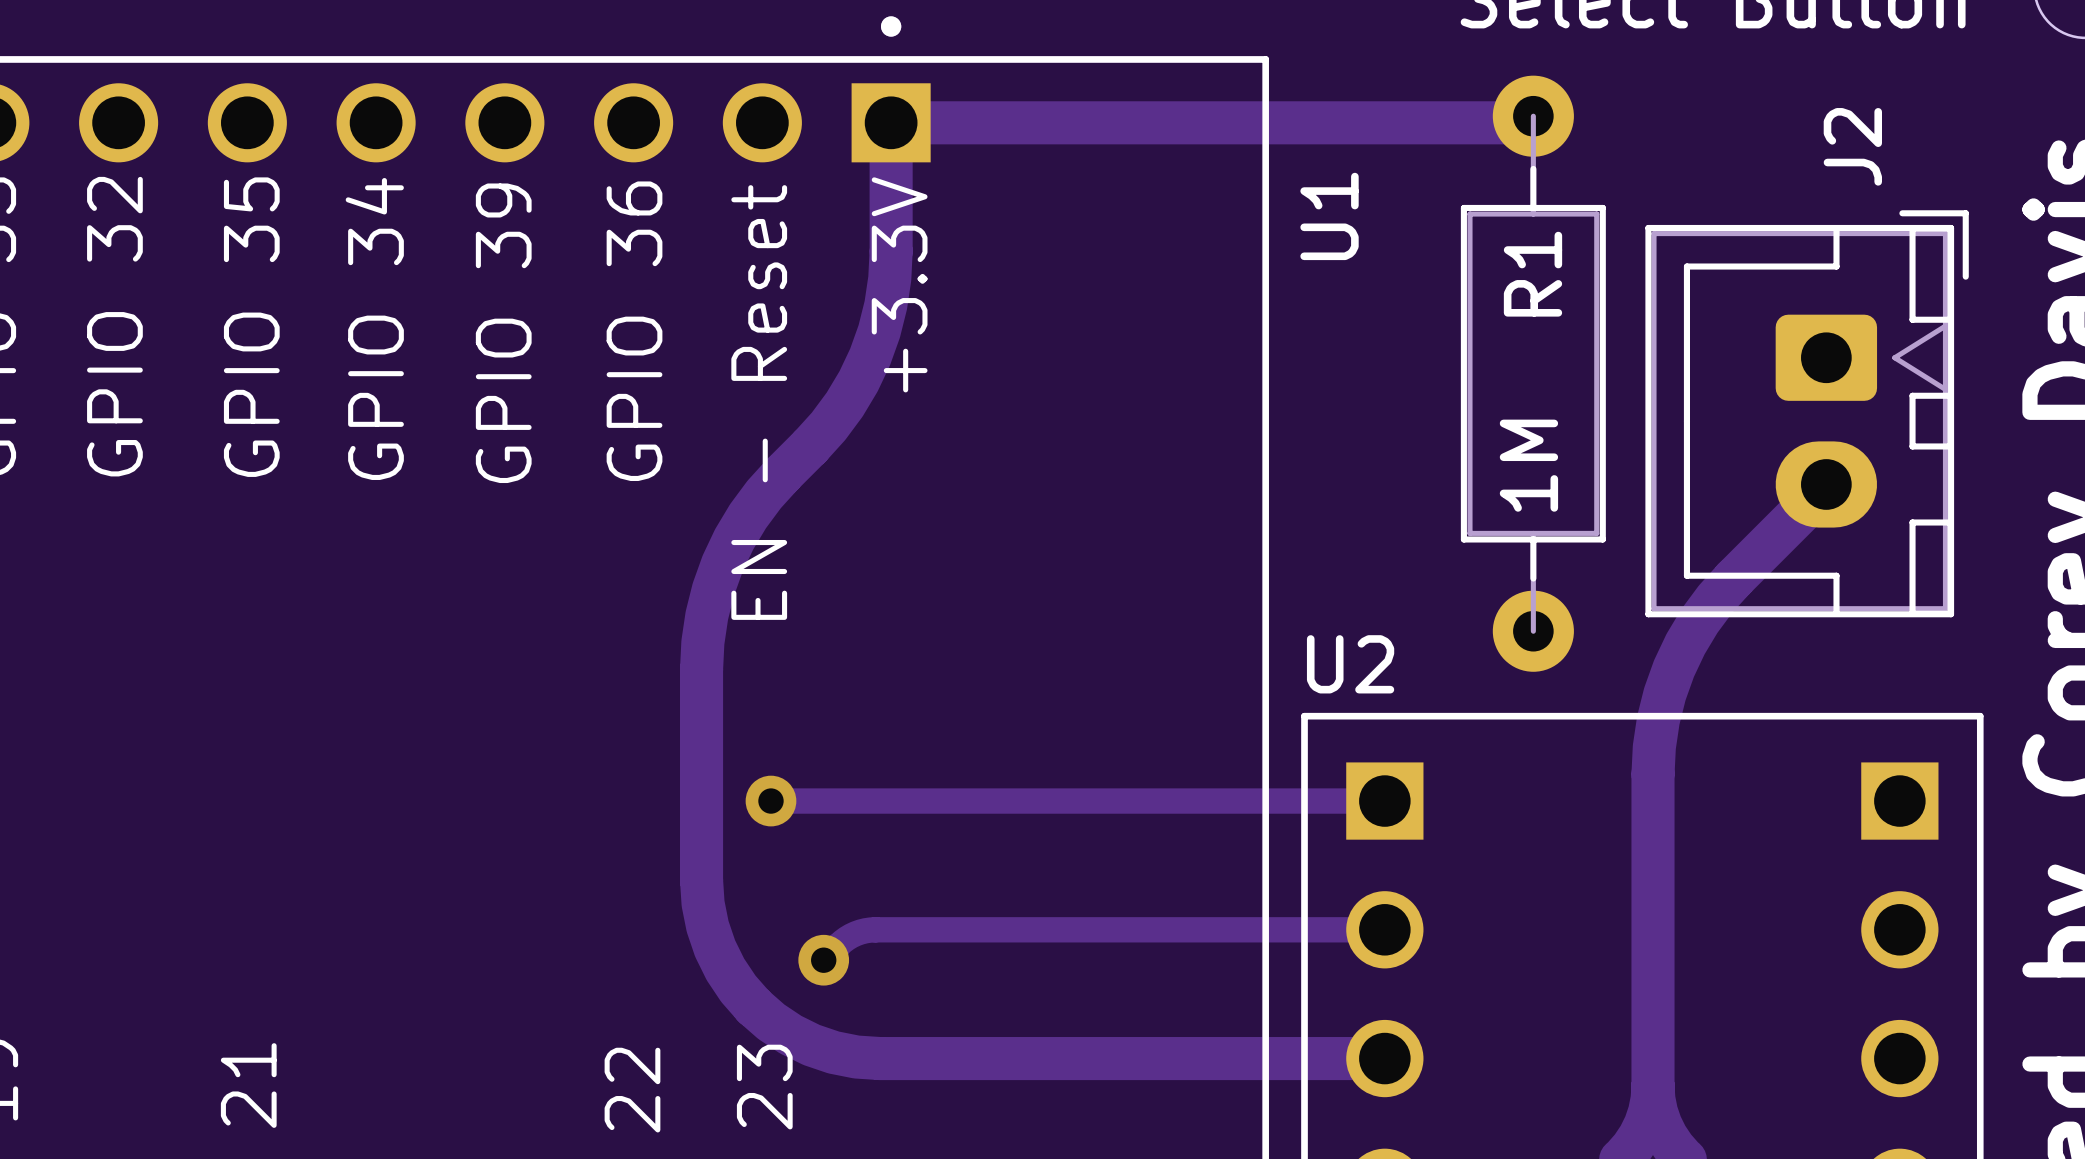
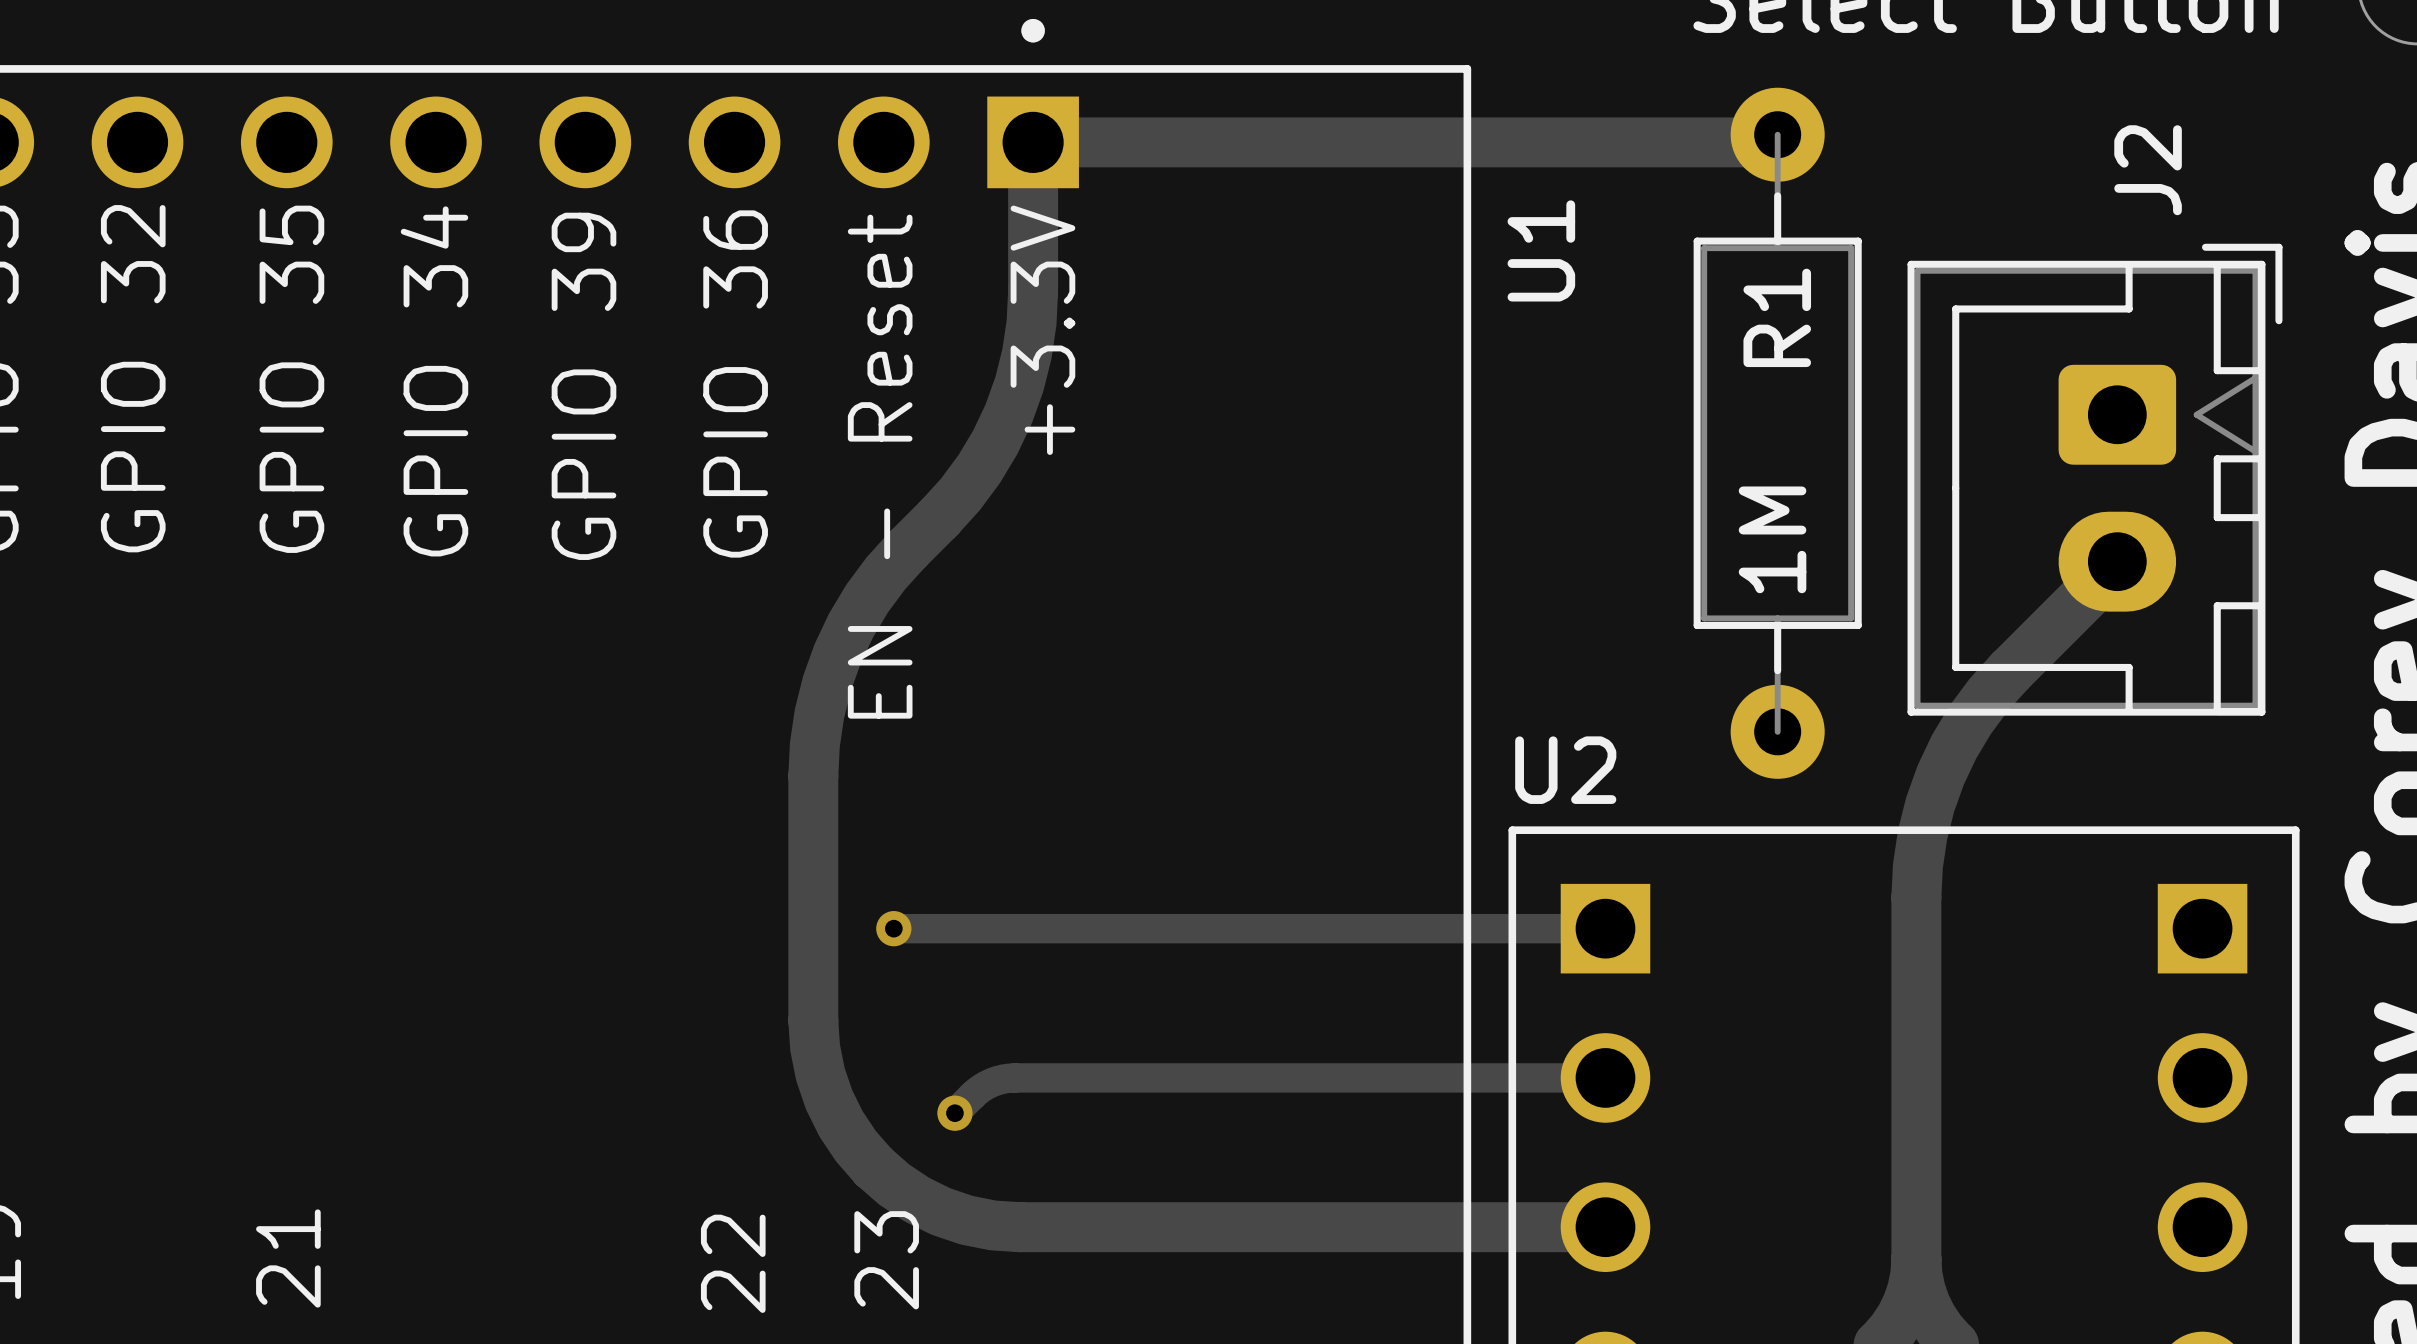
via size: [745, 775, 797, 827] -> [876, 911, 912, 947]
via size: [798, 934, 850, 986] -> [937, 1095, 973, 1131]

